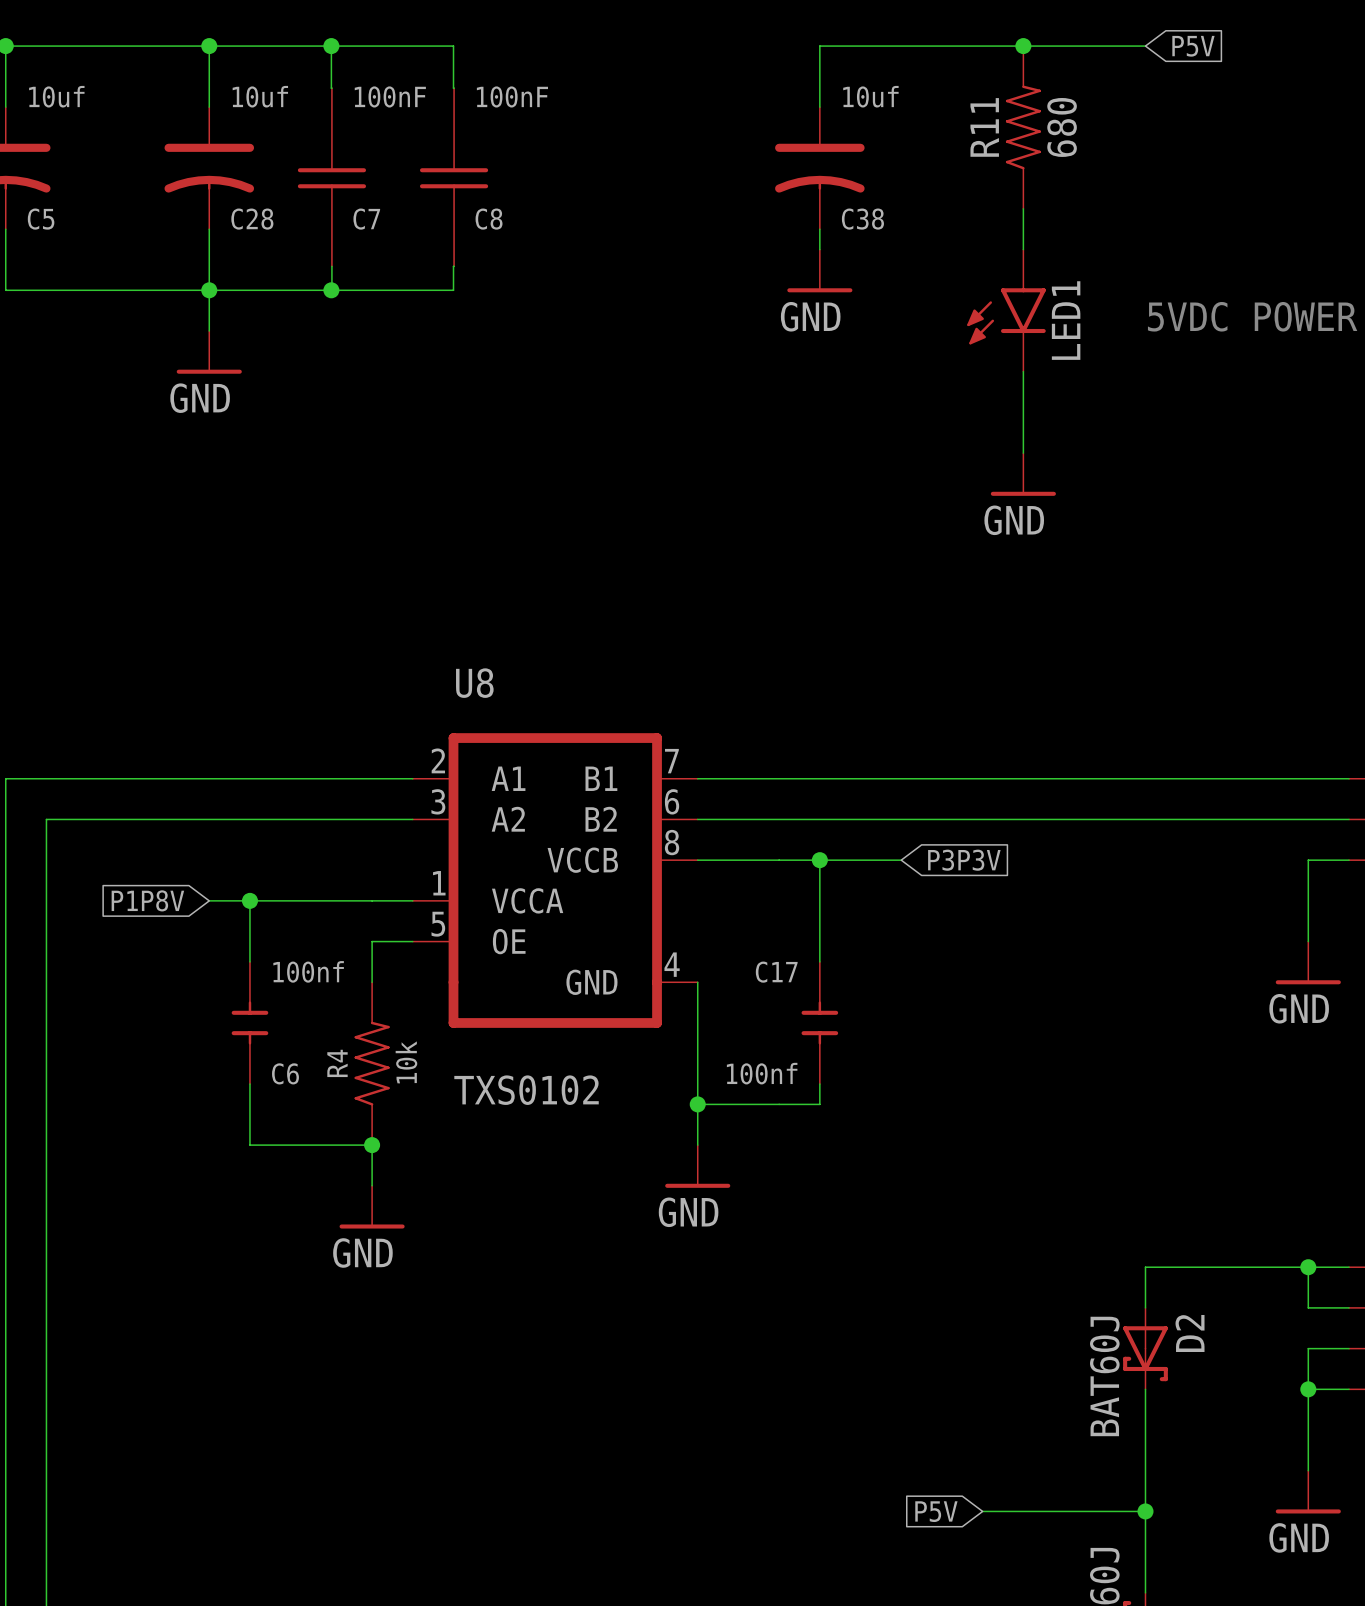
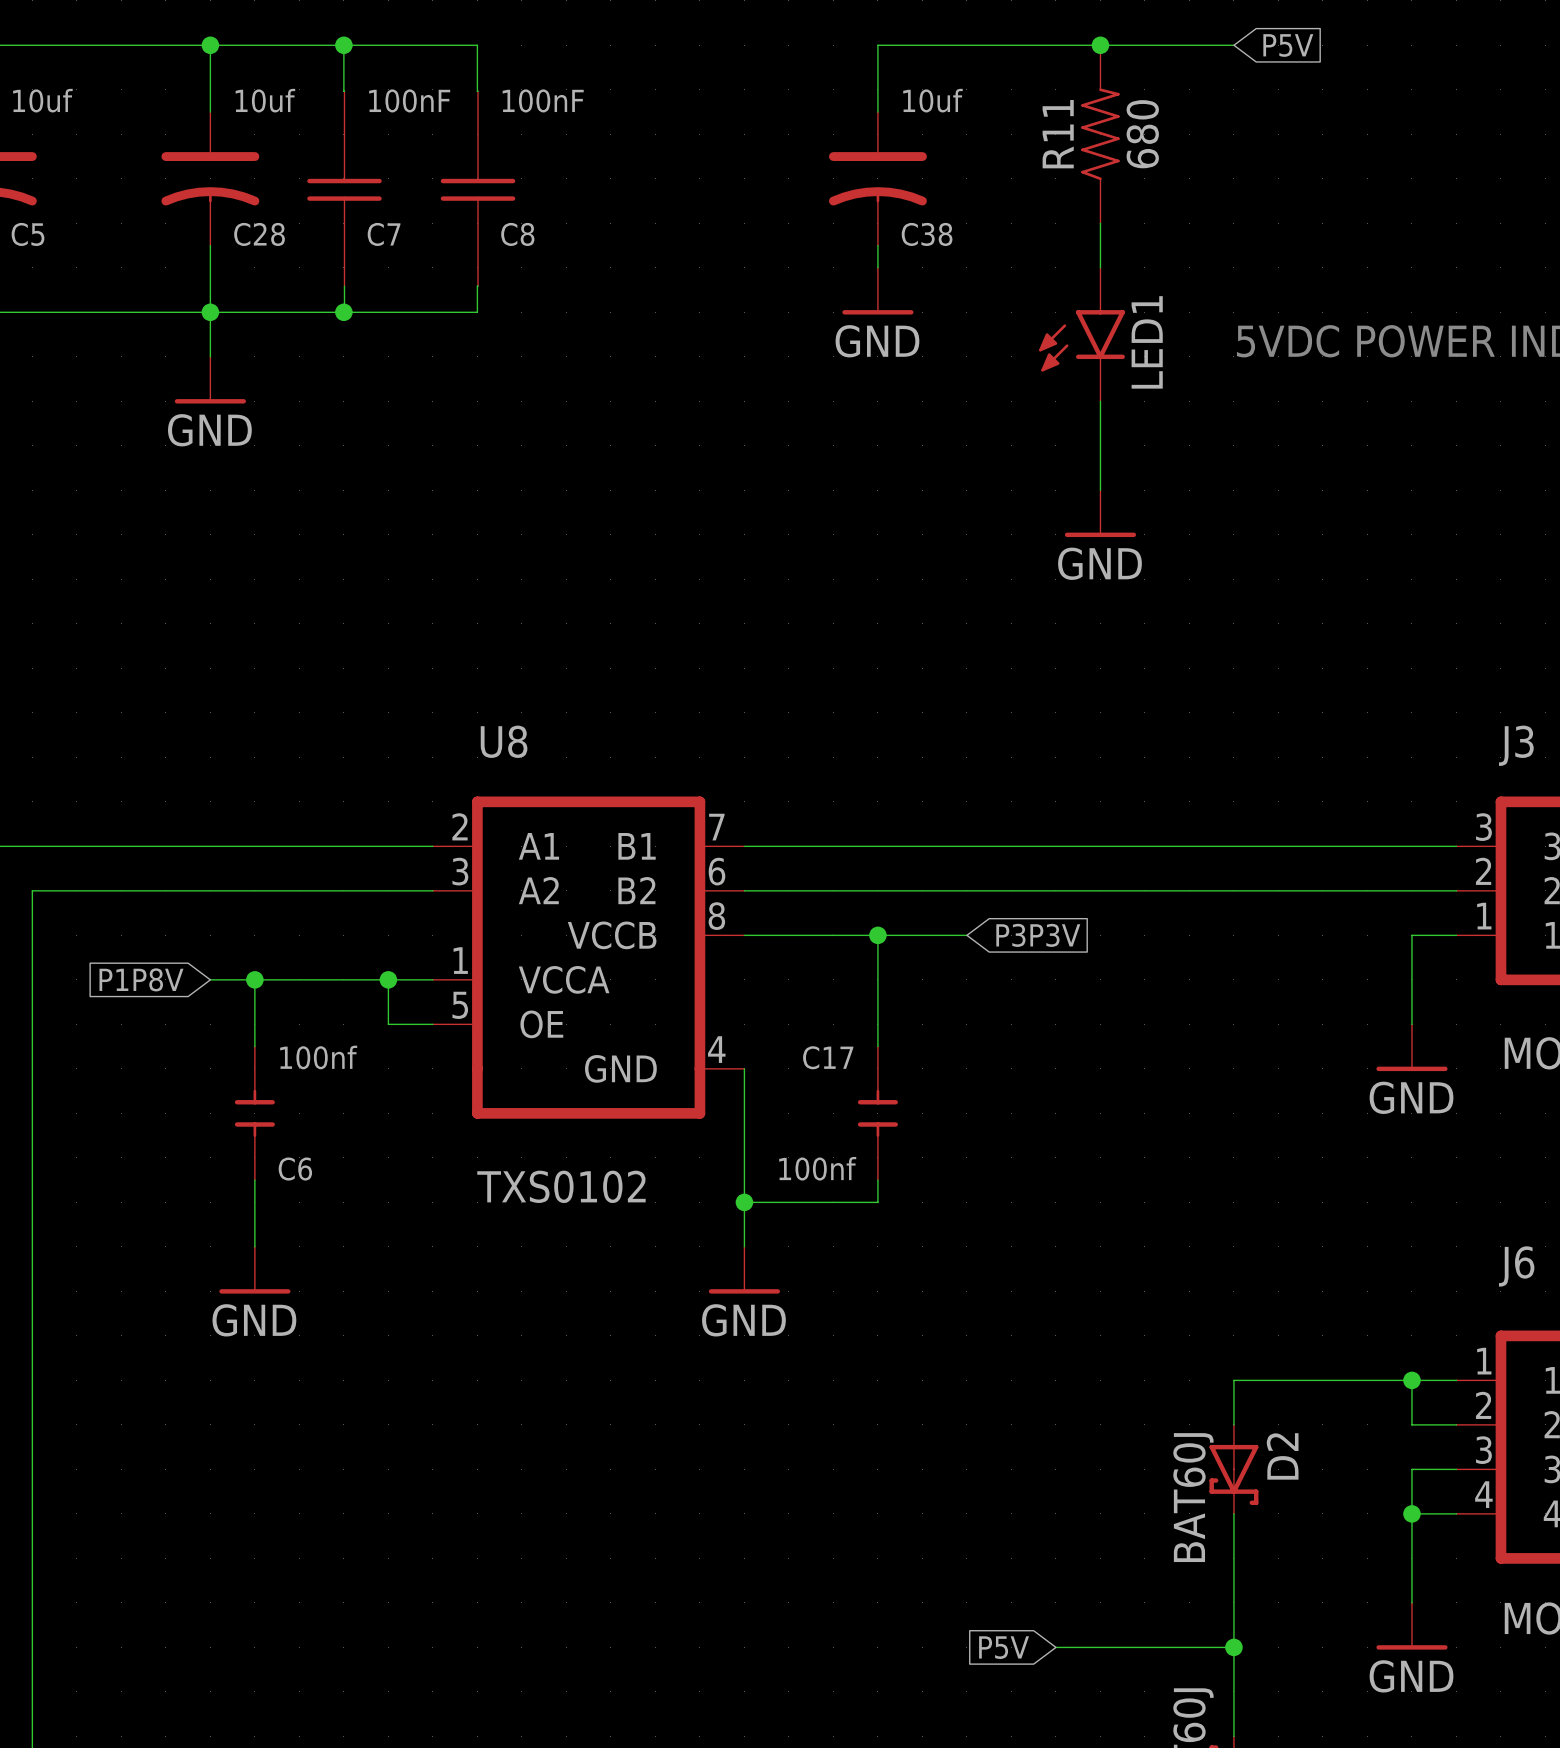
junction: none -> (388, 979)
wire: (372, 941) (372, 982) -> (388, 1024) (388, 979)
R4: 10k (372, 1063) -> none
wire: (249, 1145) (372, 1145) (372, 1185) -> none
junction: (372, 1145) -> none
power symbol position: GND (372, 1207) -> GND (254, 1270)

